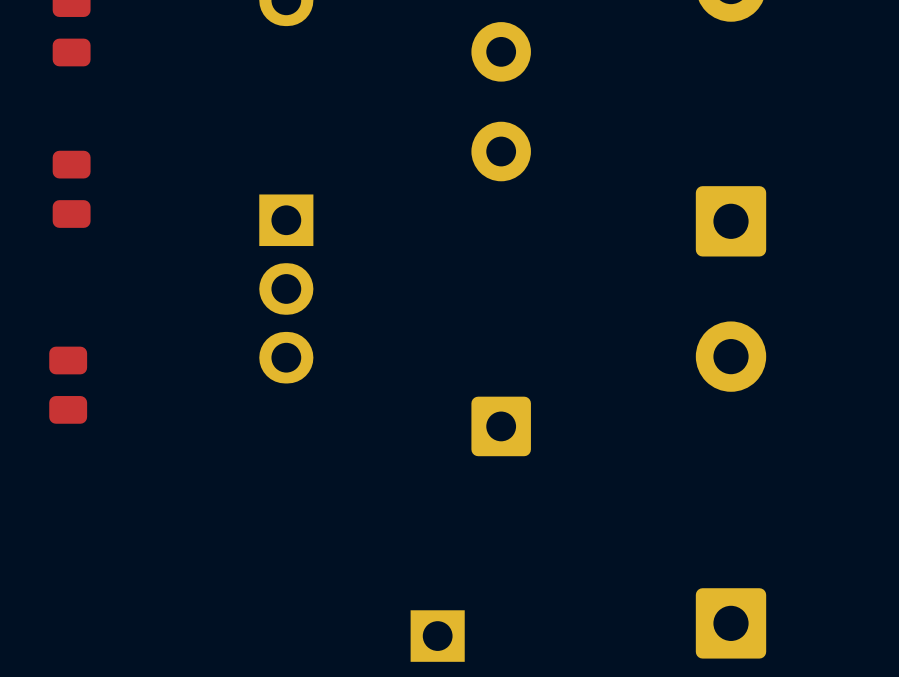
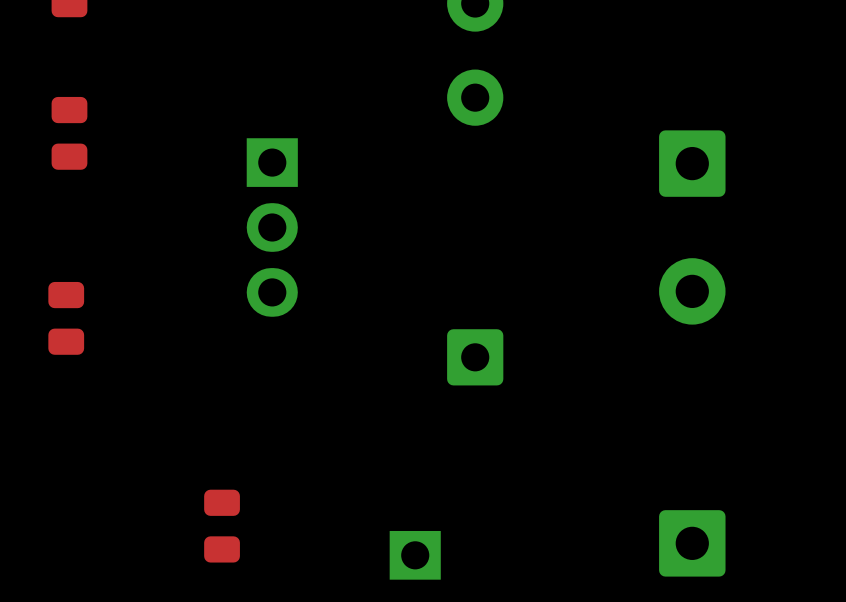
part: none -> (222, 526)

